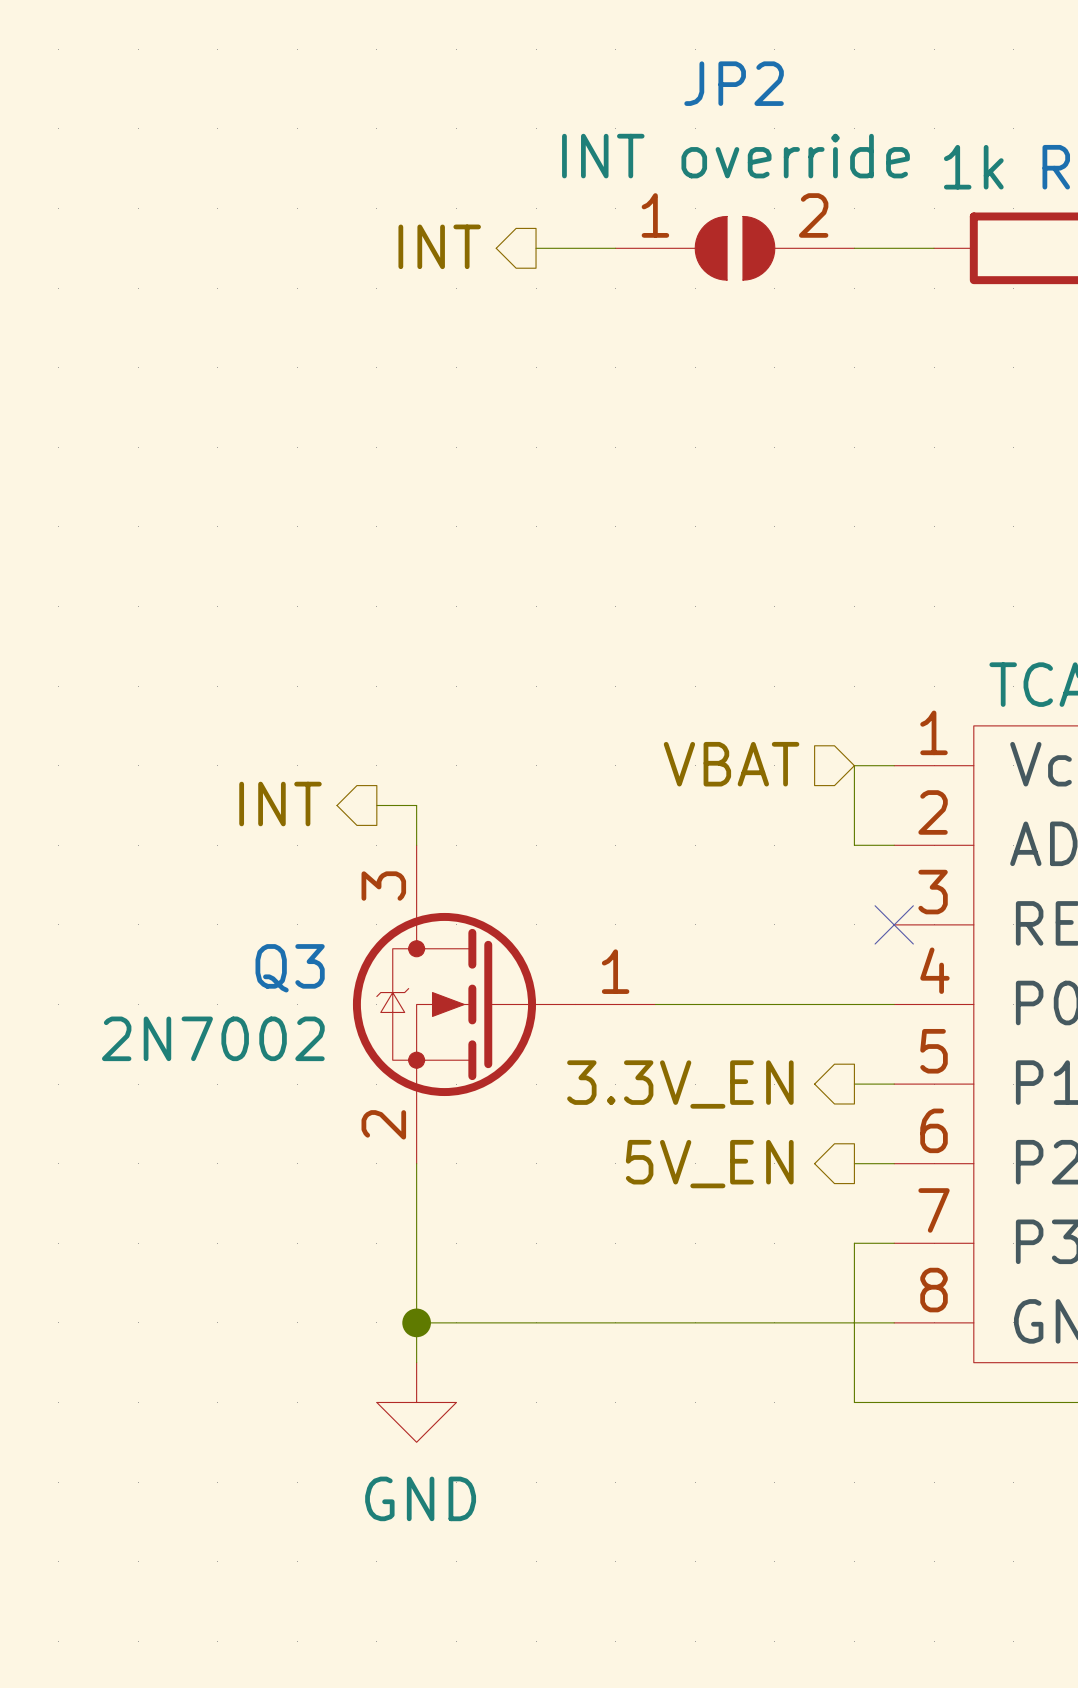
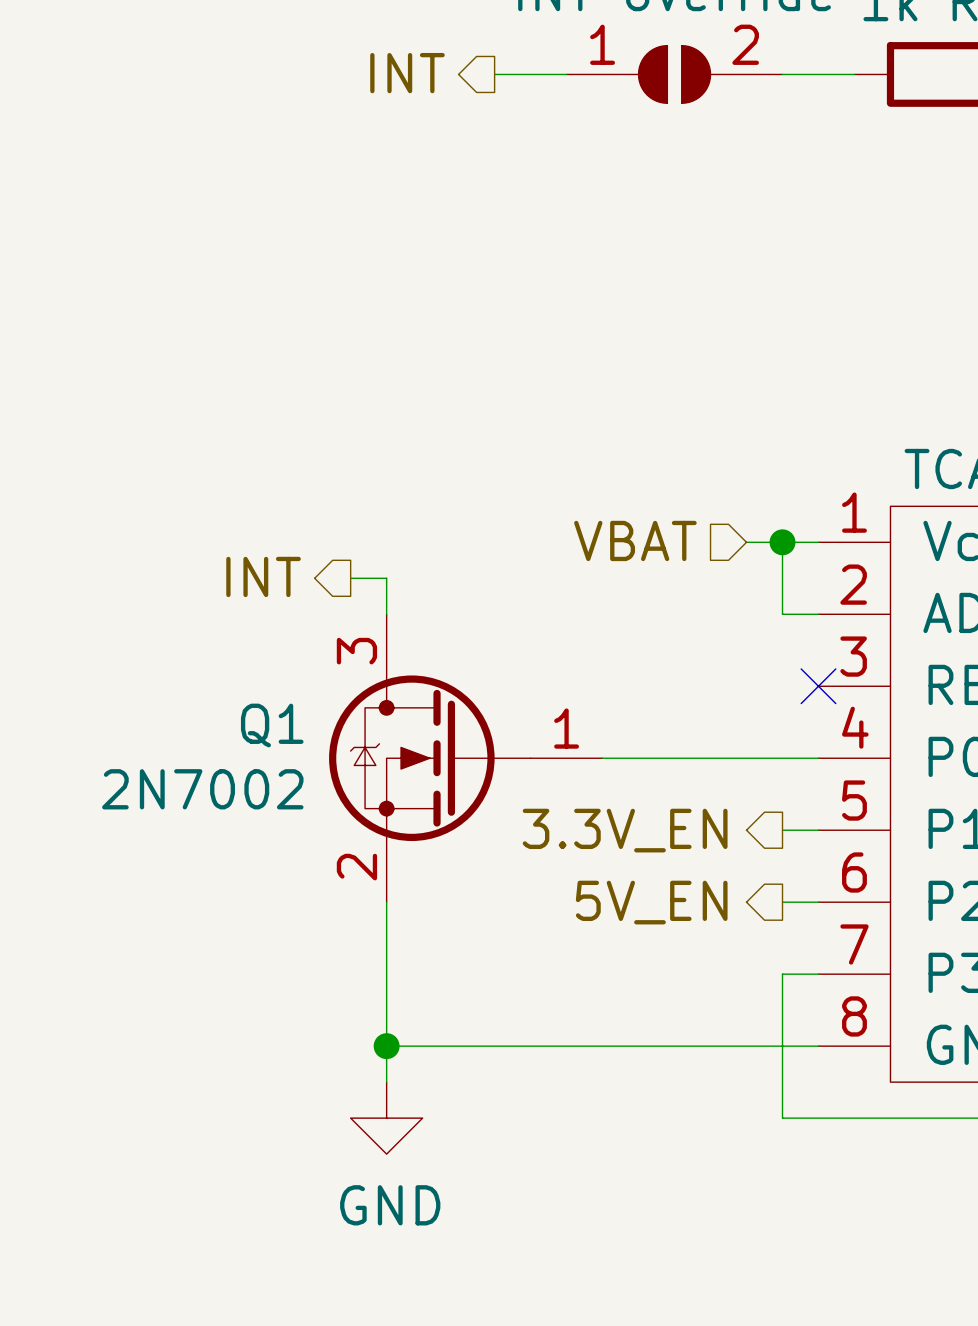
hierarchical label position: VBAT (731, 764) -> VBAT (635, 540)
wire: none -> (746, 542) (782, 542)
junction: none -> (782, 542)
Q3 name: Q3 (290, 968) -> Q1 (272, 725)

